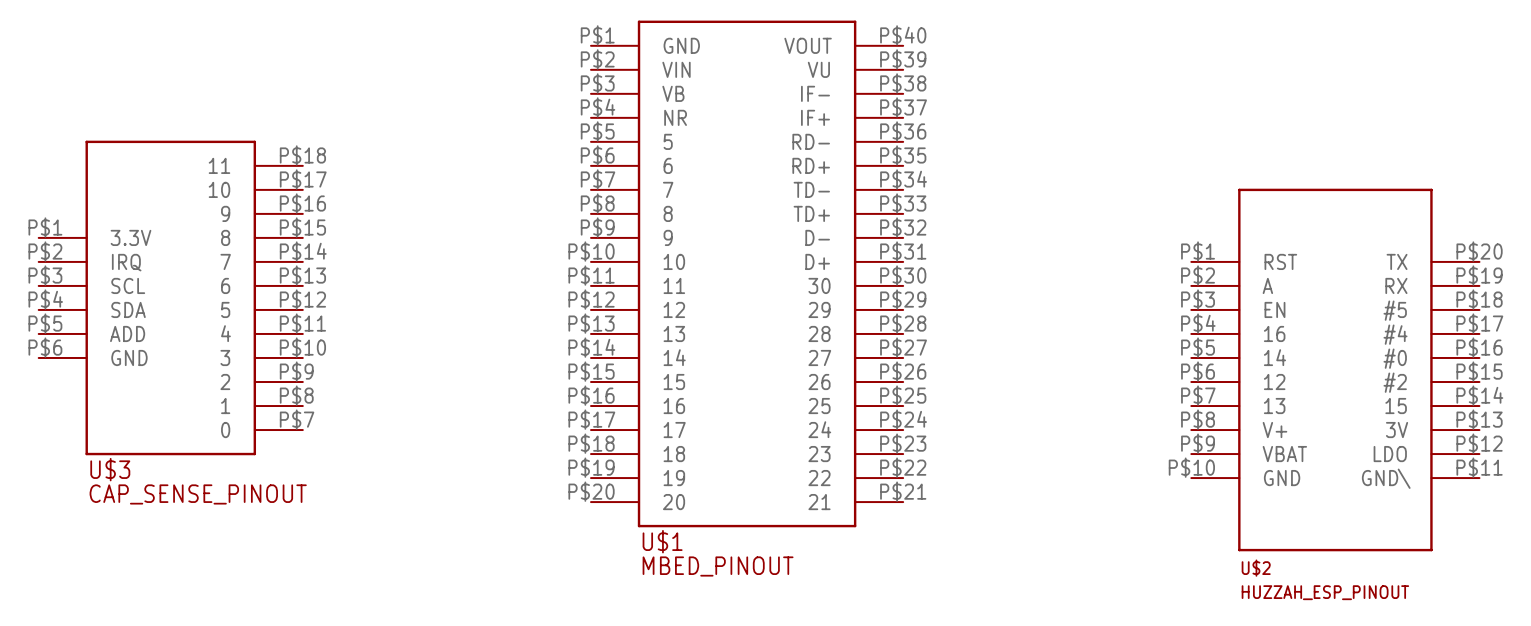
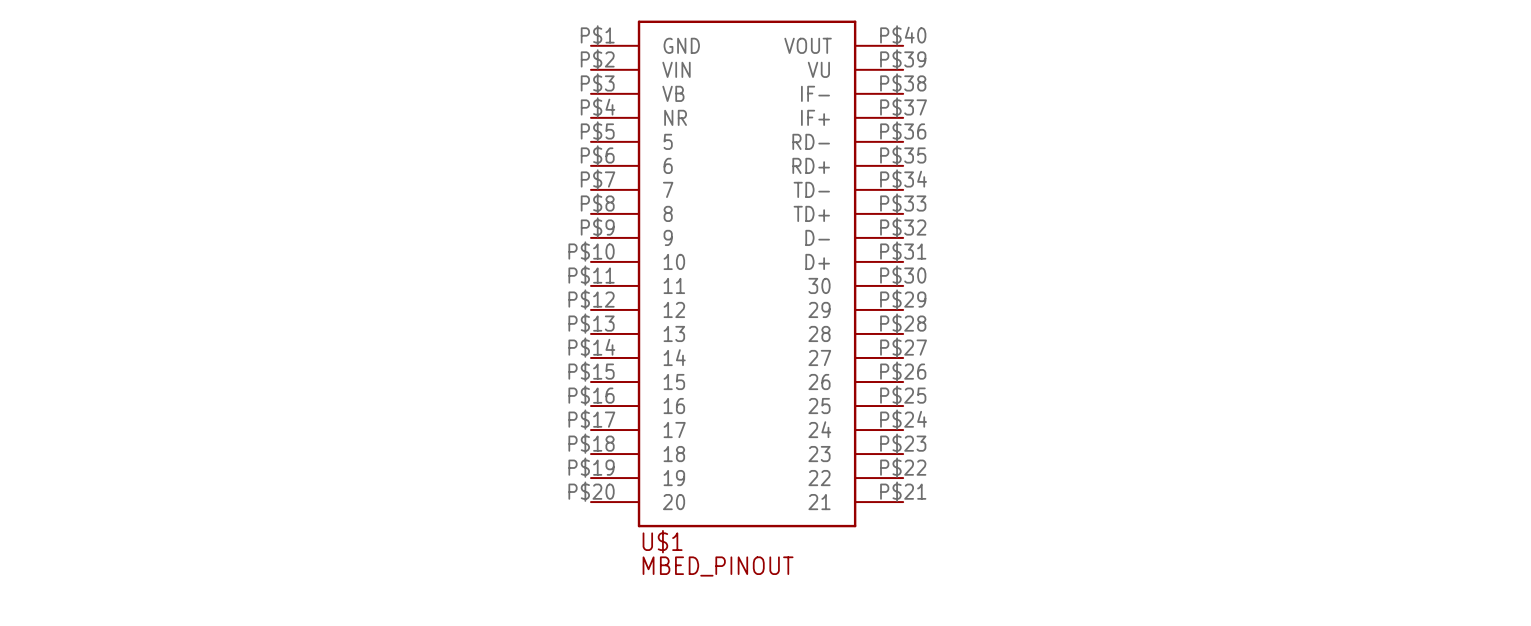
U$3: (170, 297) -> none
U$2: (1335, 369) -> none

